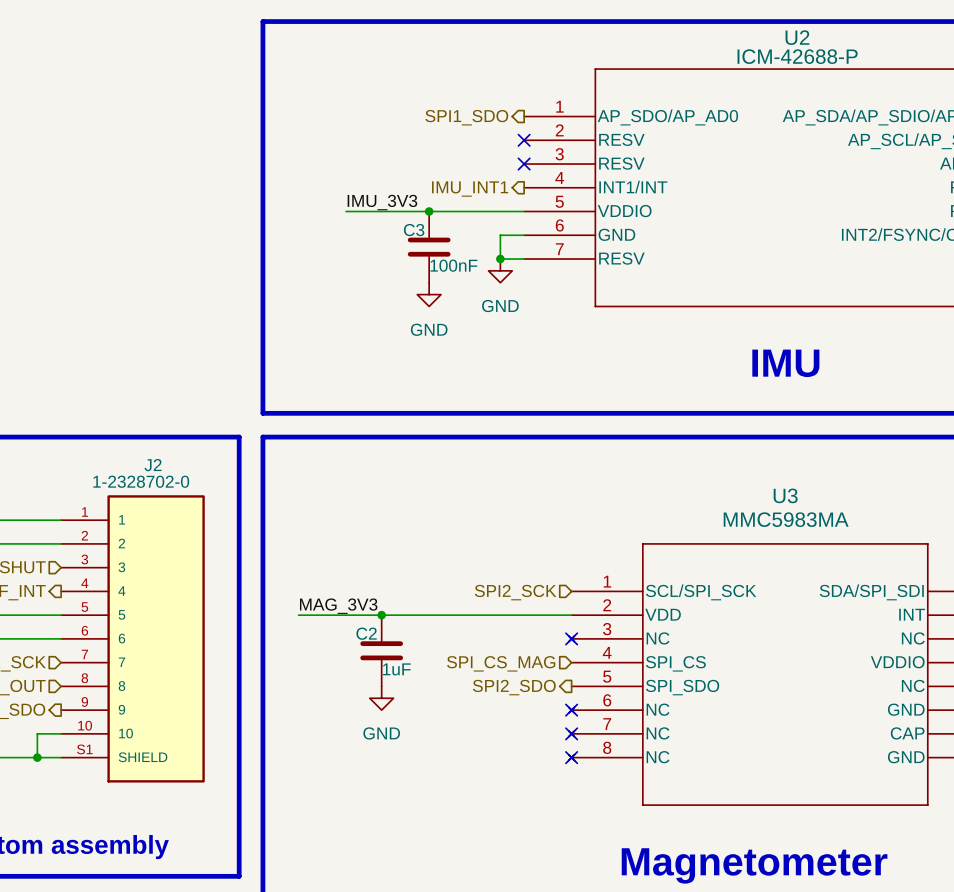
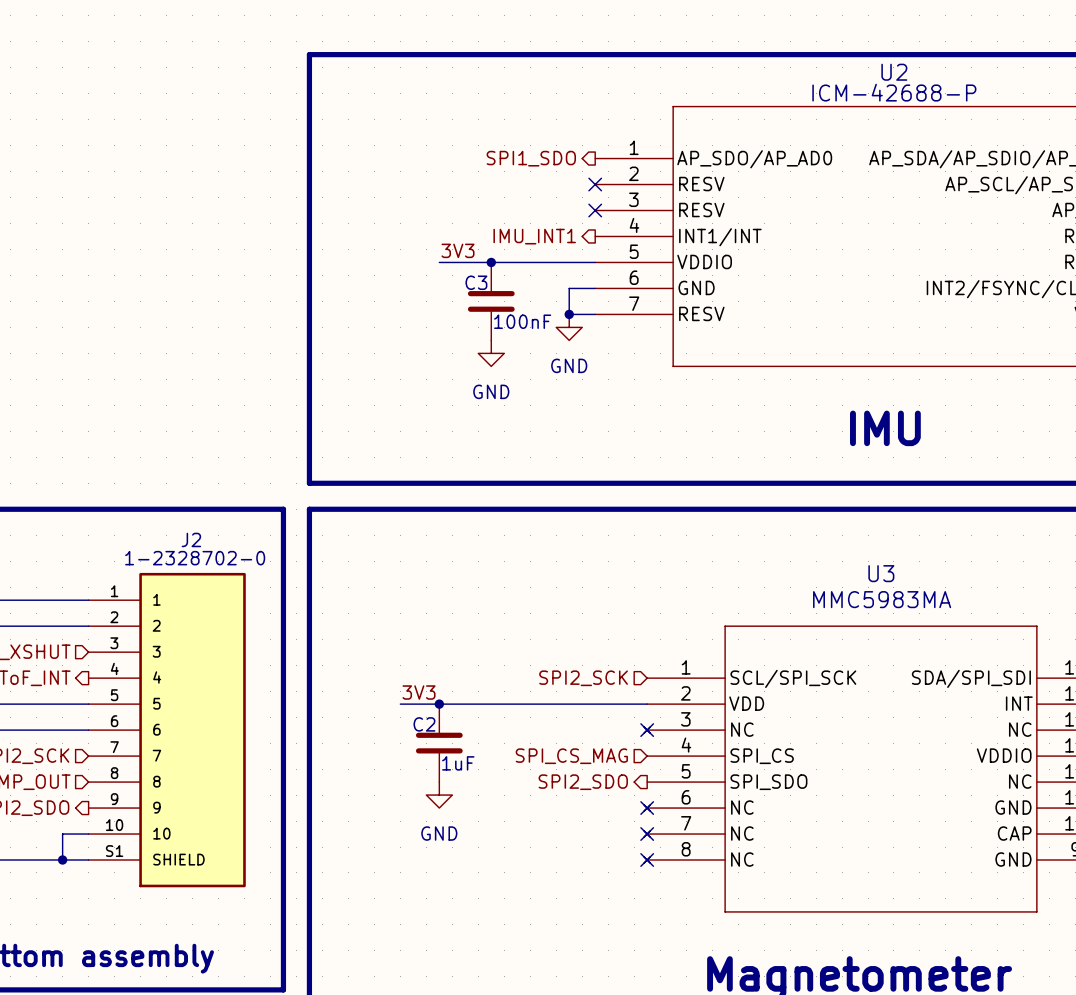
label: none -> 3V3 (457, 250)
label: IMU_3V3 (382, 202) -> none
wire: (346, 211) (381, 211) -> none
label: none -> 3V3 (419, 692)
label: MAG_3V3 (338, 606) -> none
wire: (298, 615) (346, 615) -> none

